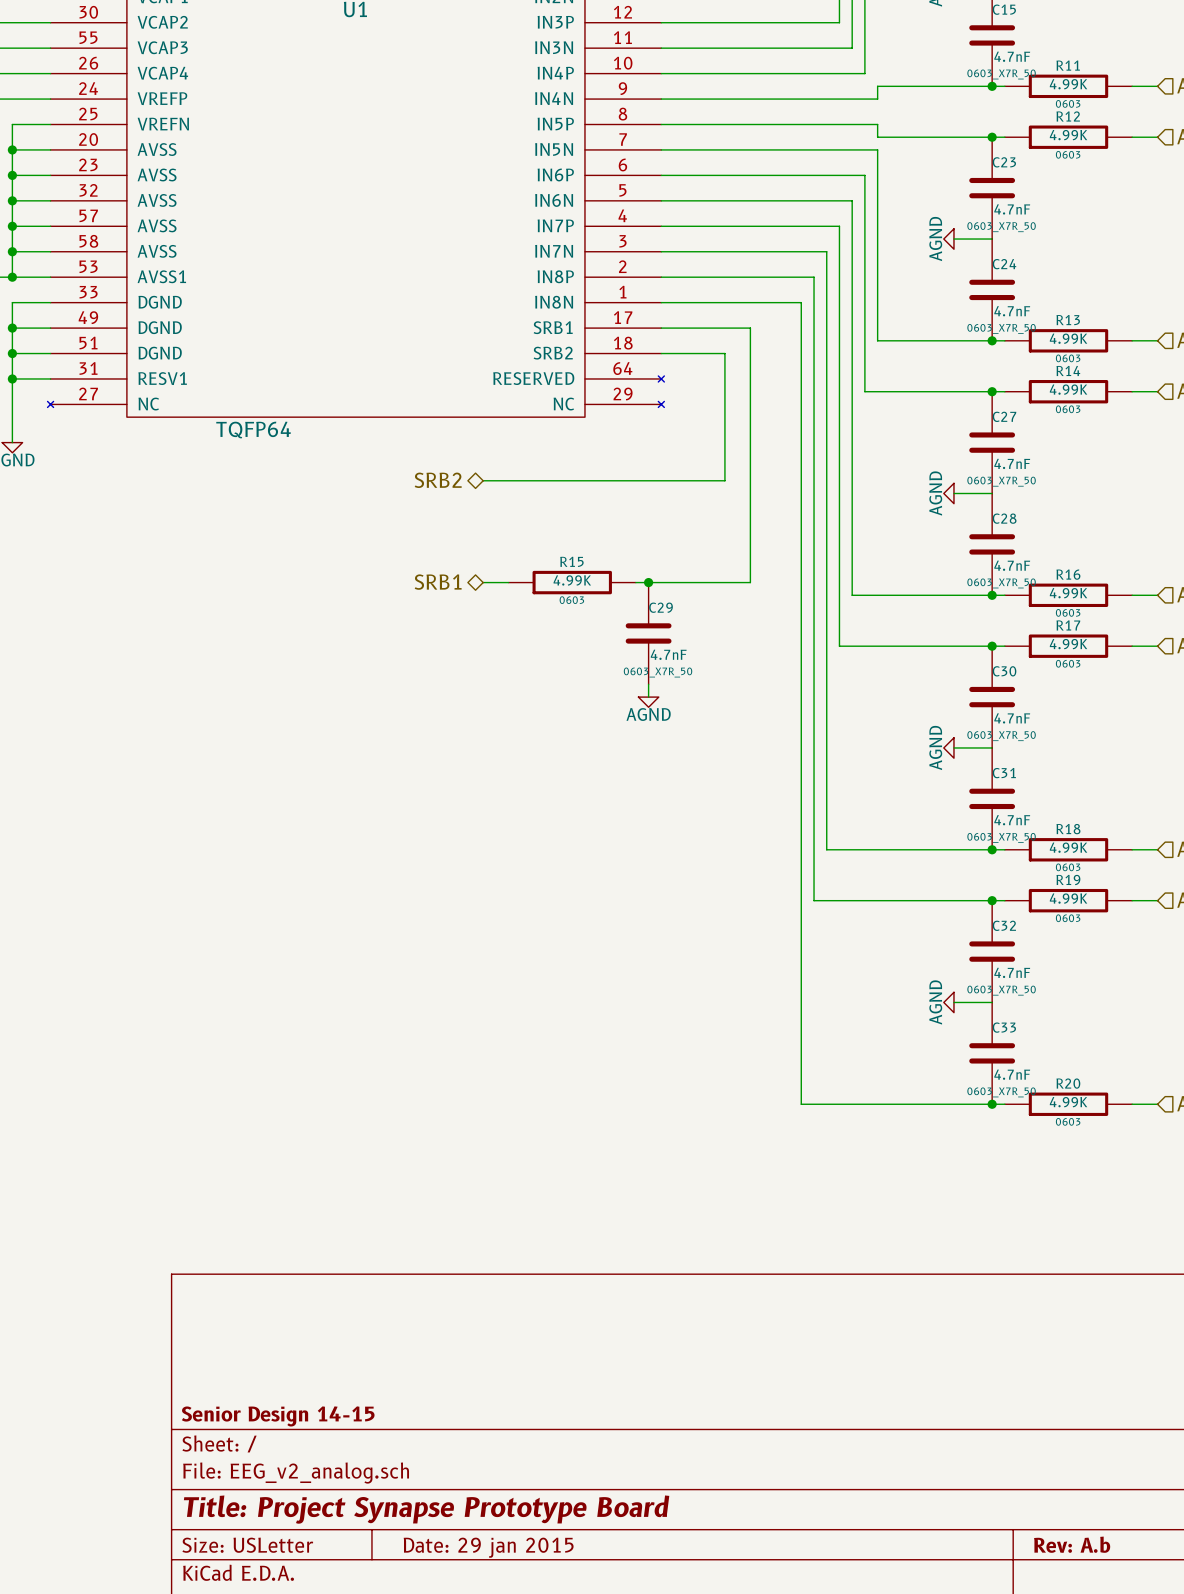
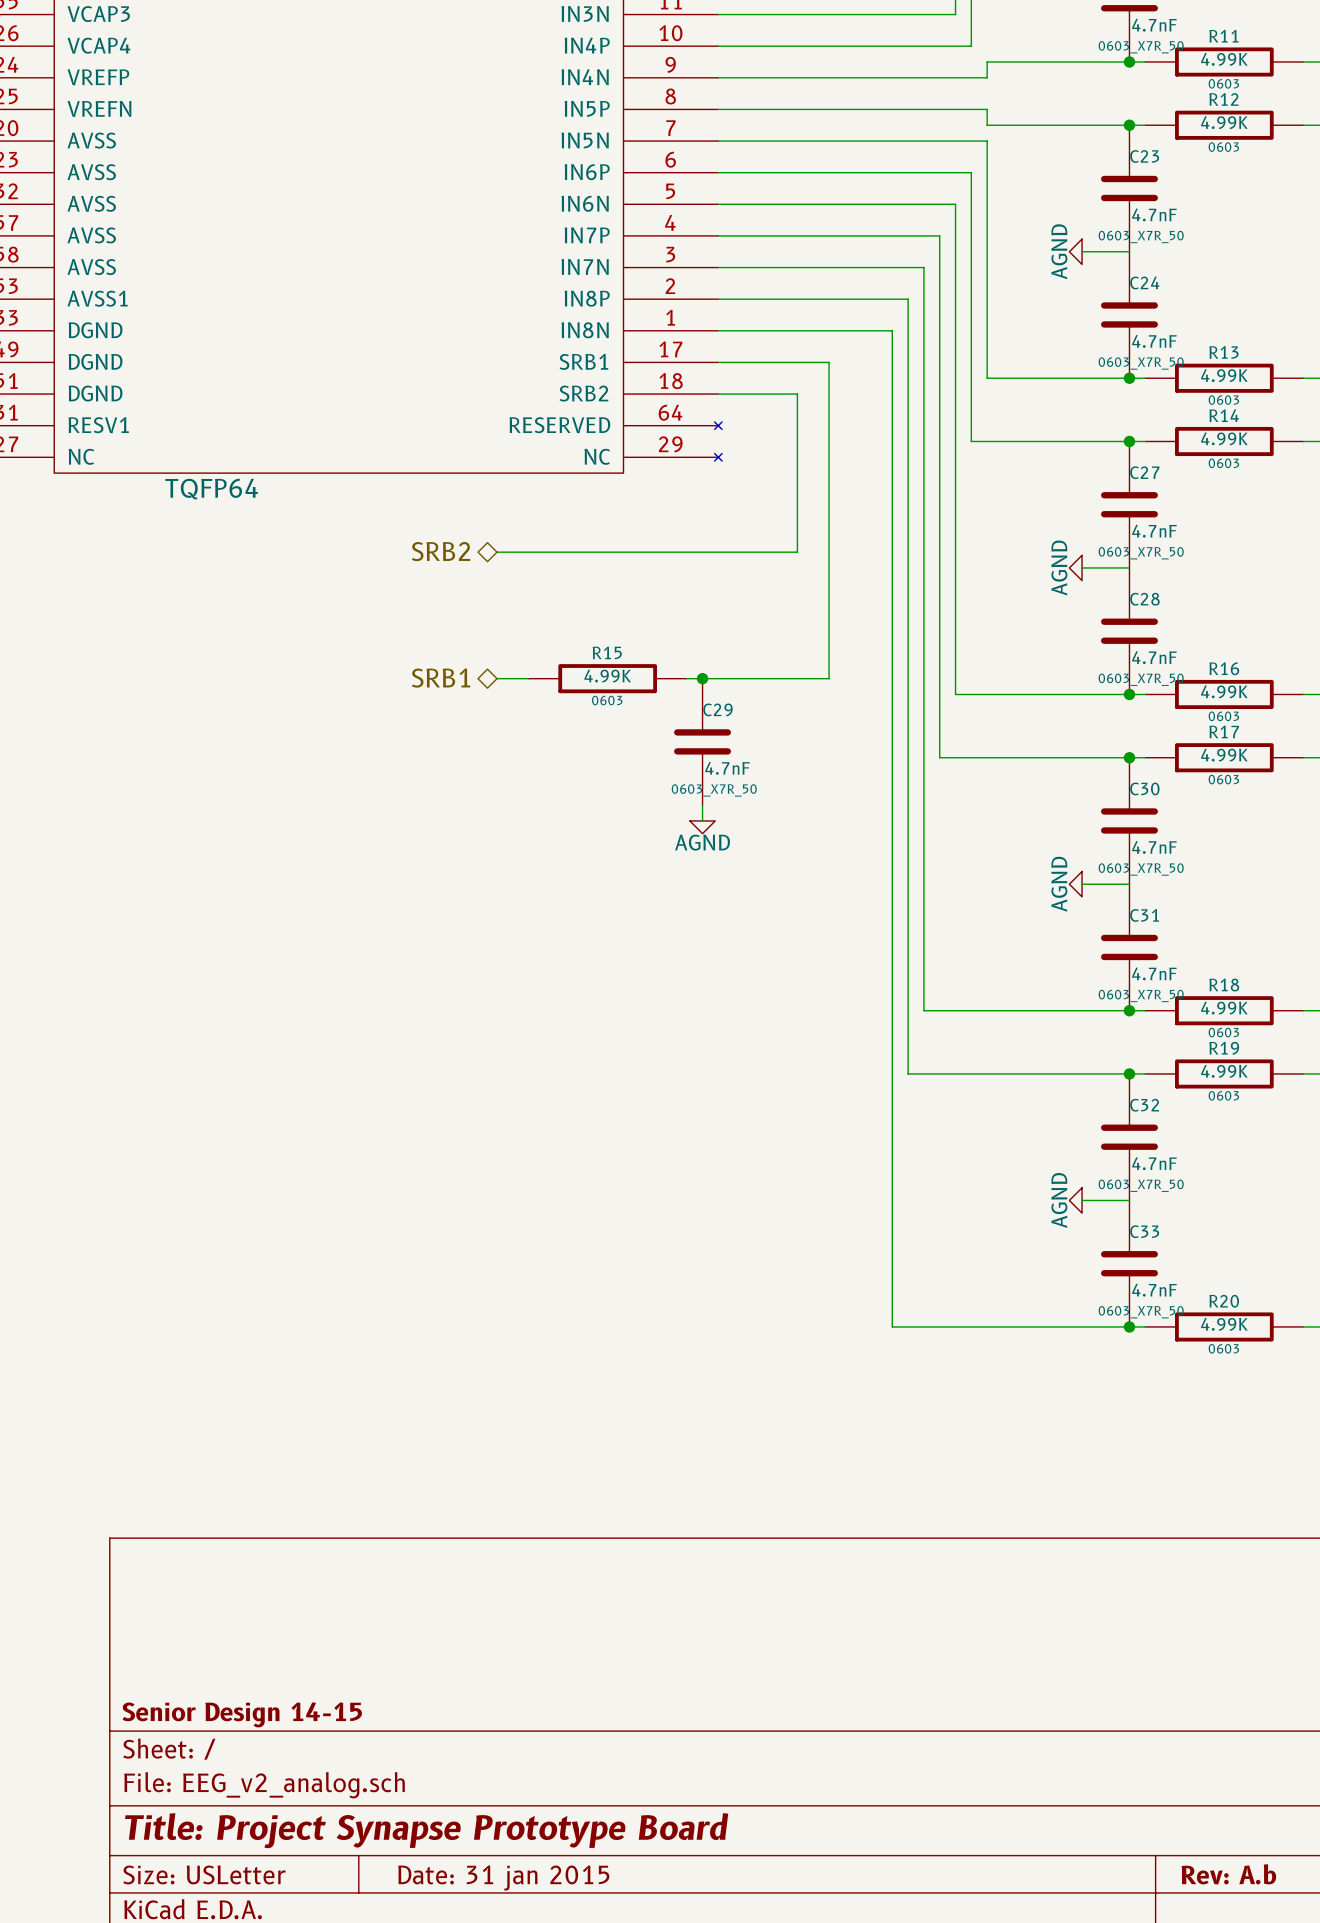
title block: Date: 29 jan 2015 (488, 1547) -> Date: 31 jan 2015 (503, 1878)

